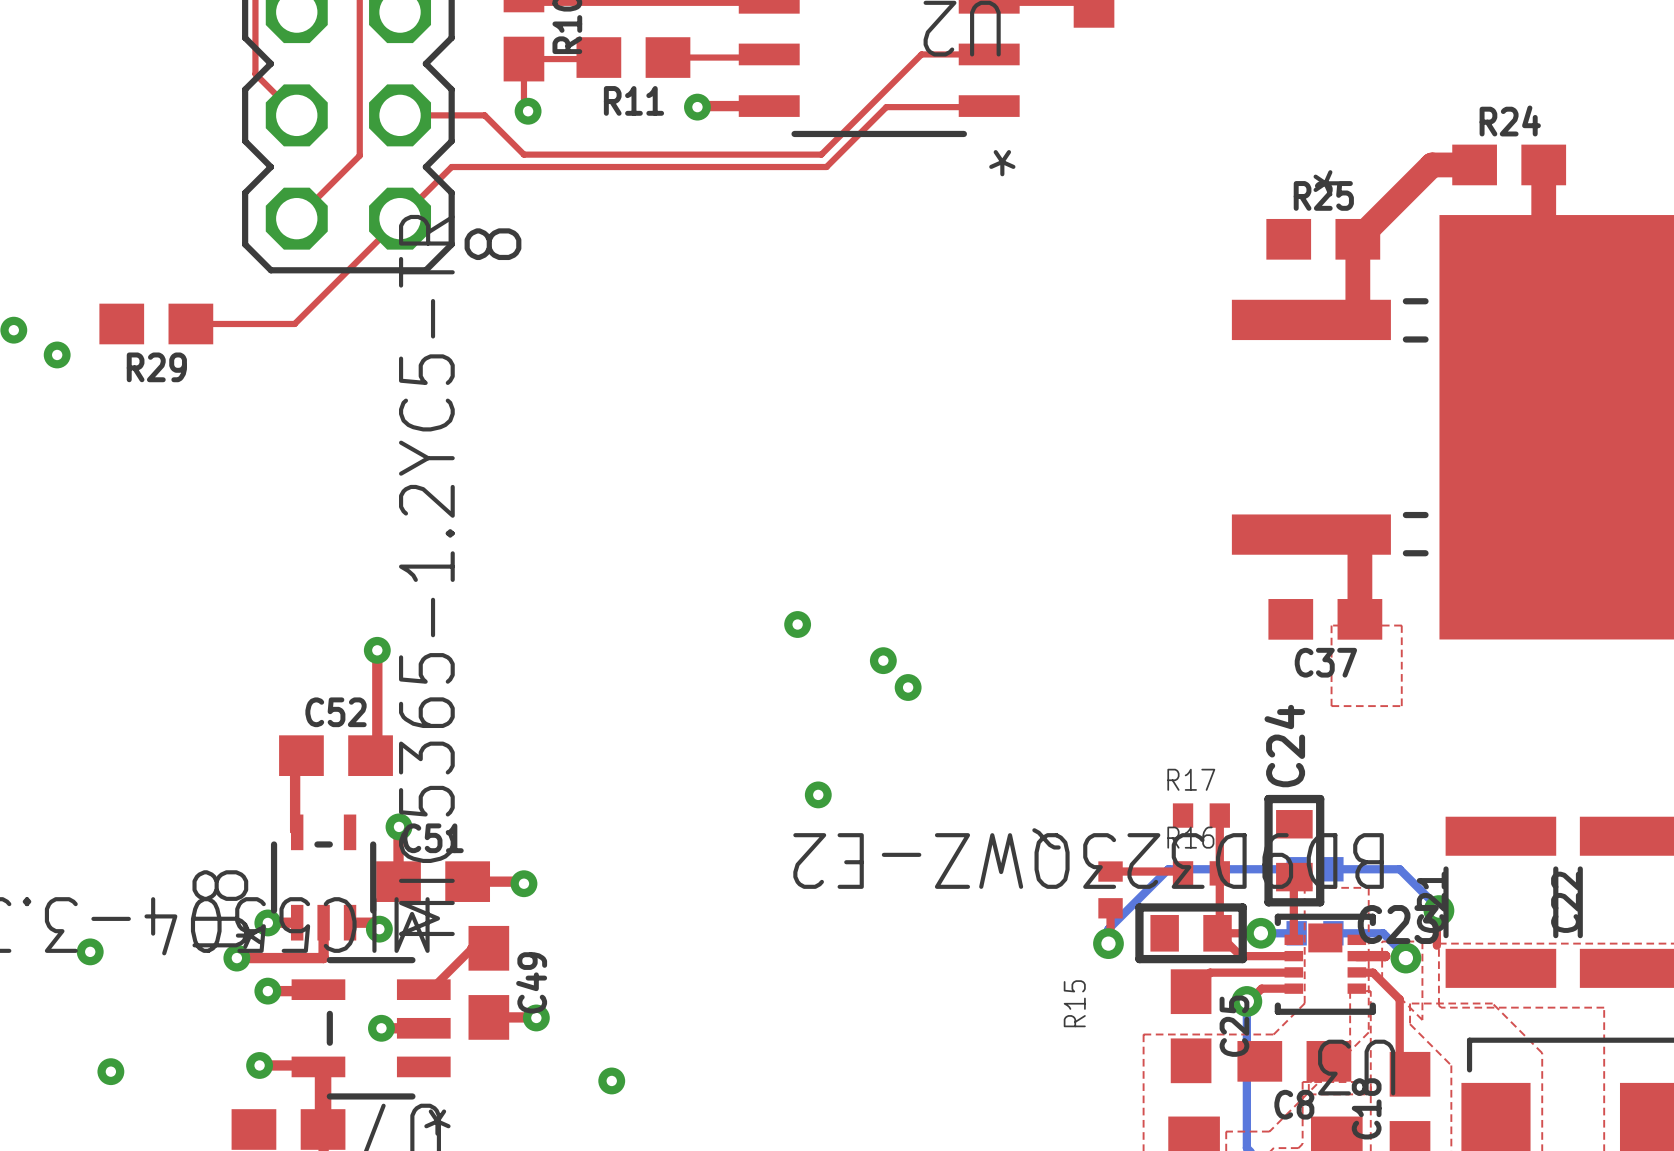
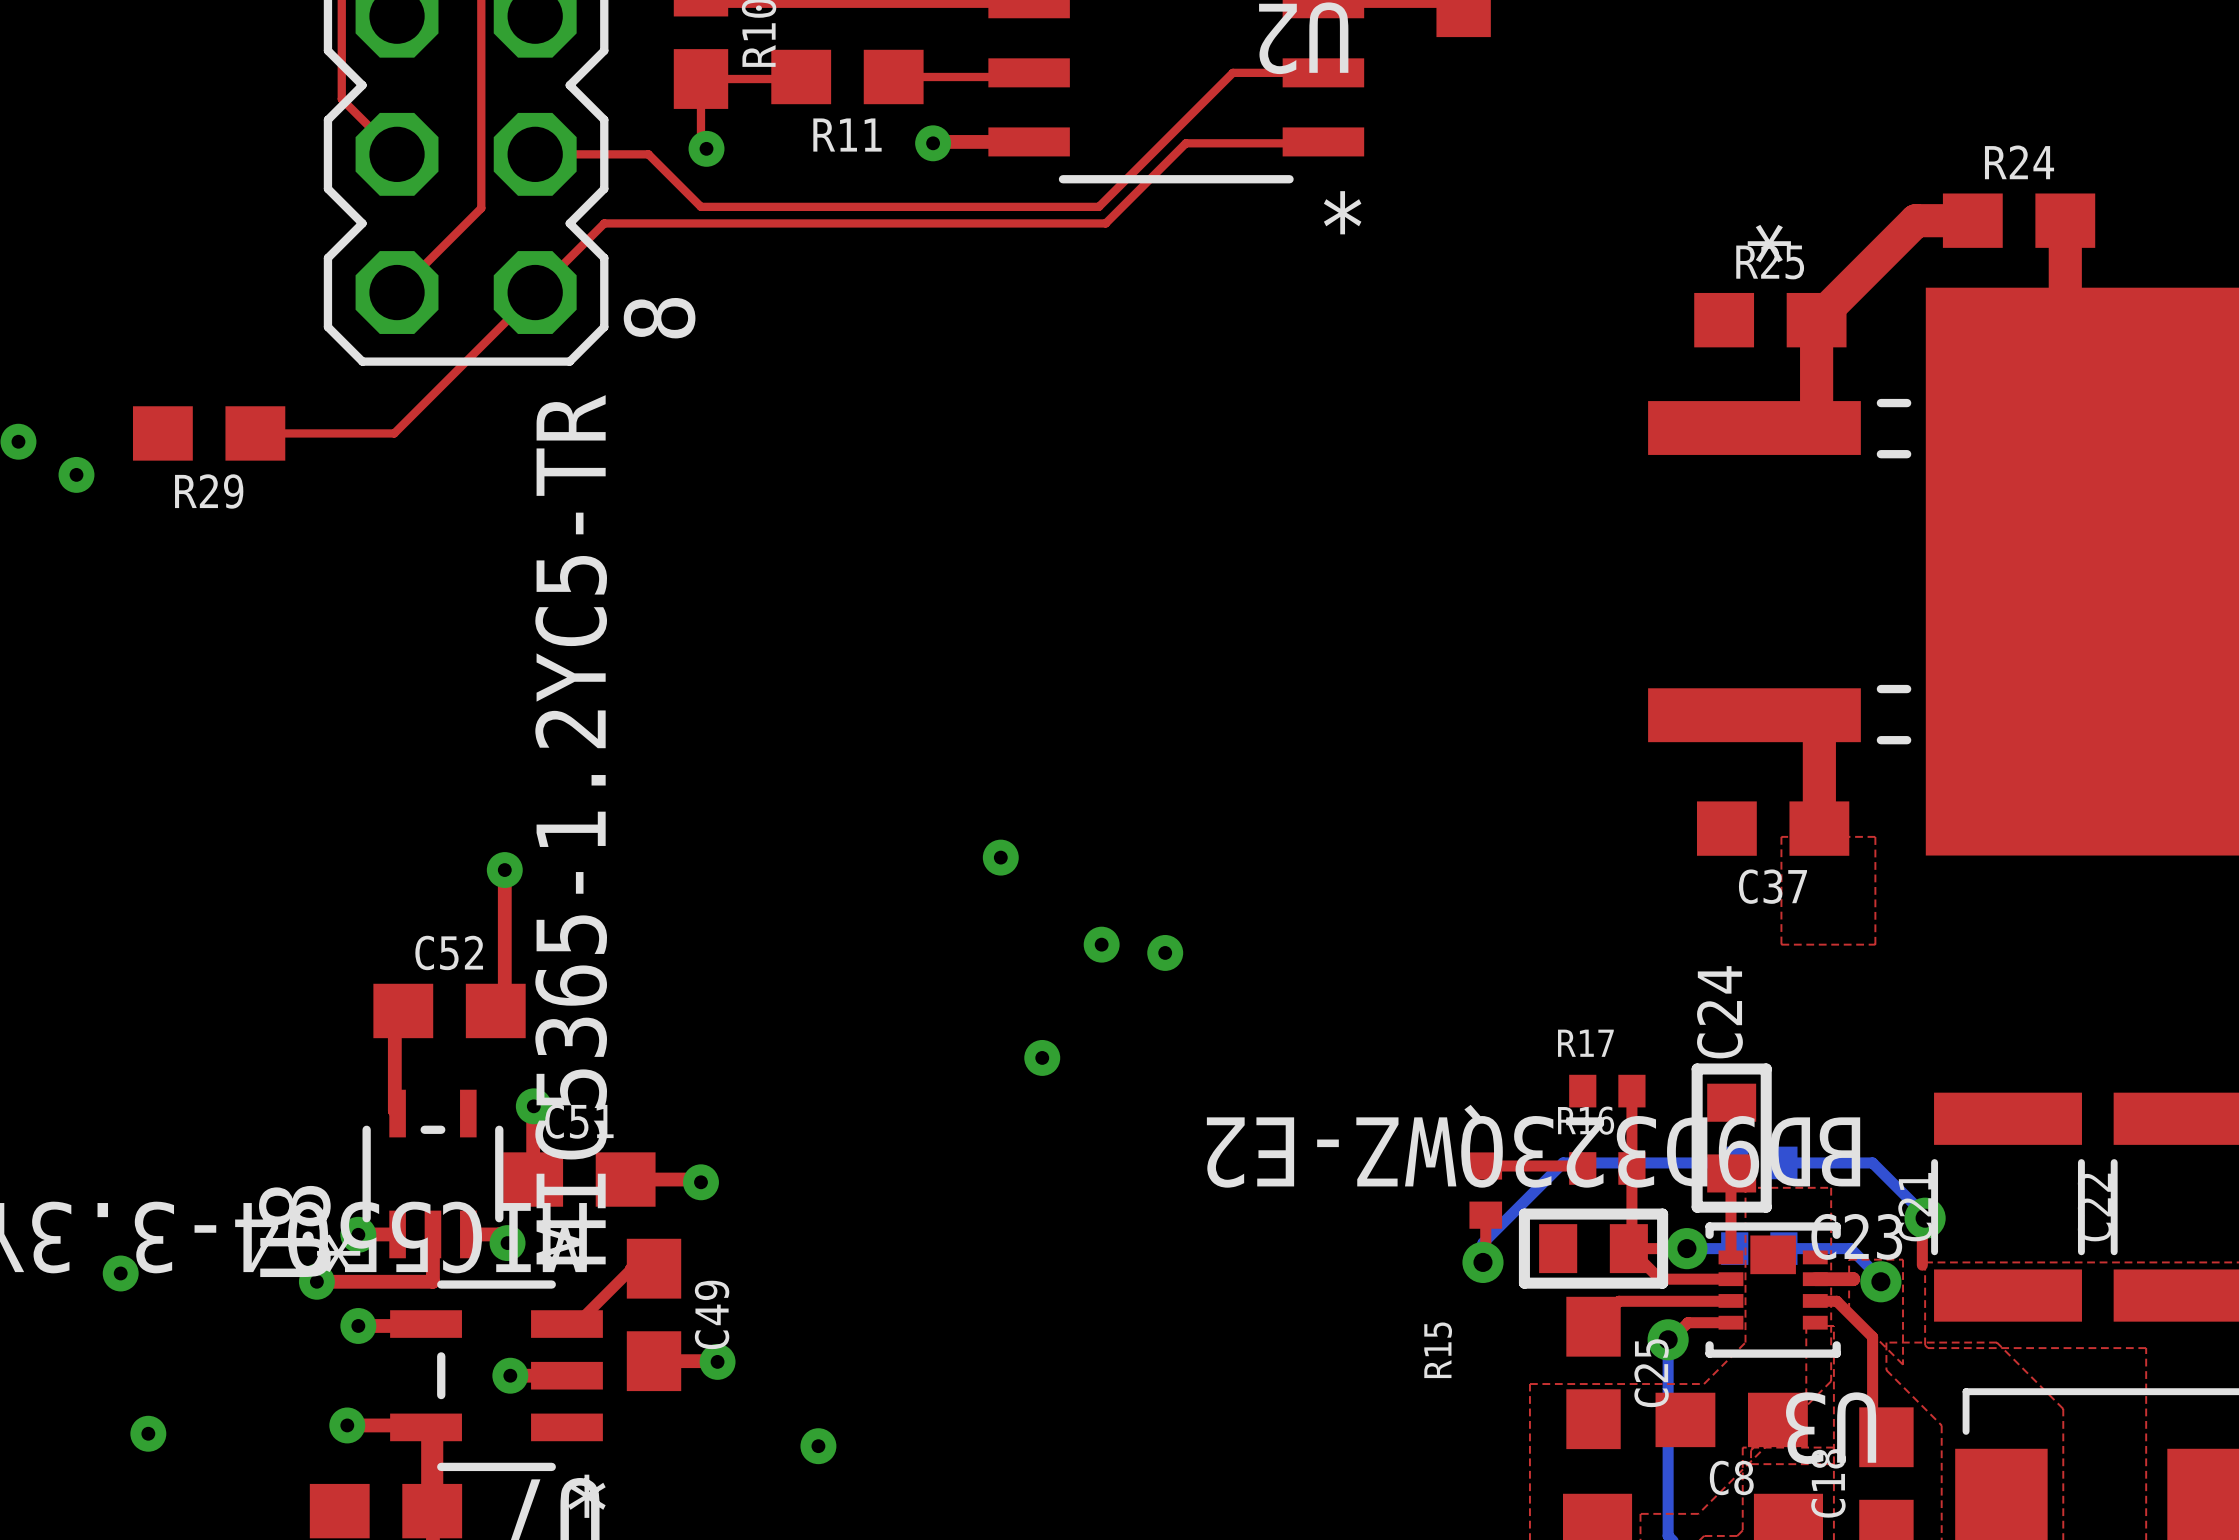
via: (797, 624) -> none
via: none -> (1000, 857)
via: (883, 660) -> none
via: (908, 687) -> none
via: none -> (1101, 944)
via: none -> (1165, 952)
via position: (818, 794) -> (1042, 1057)

